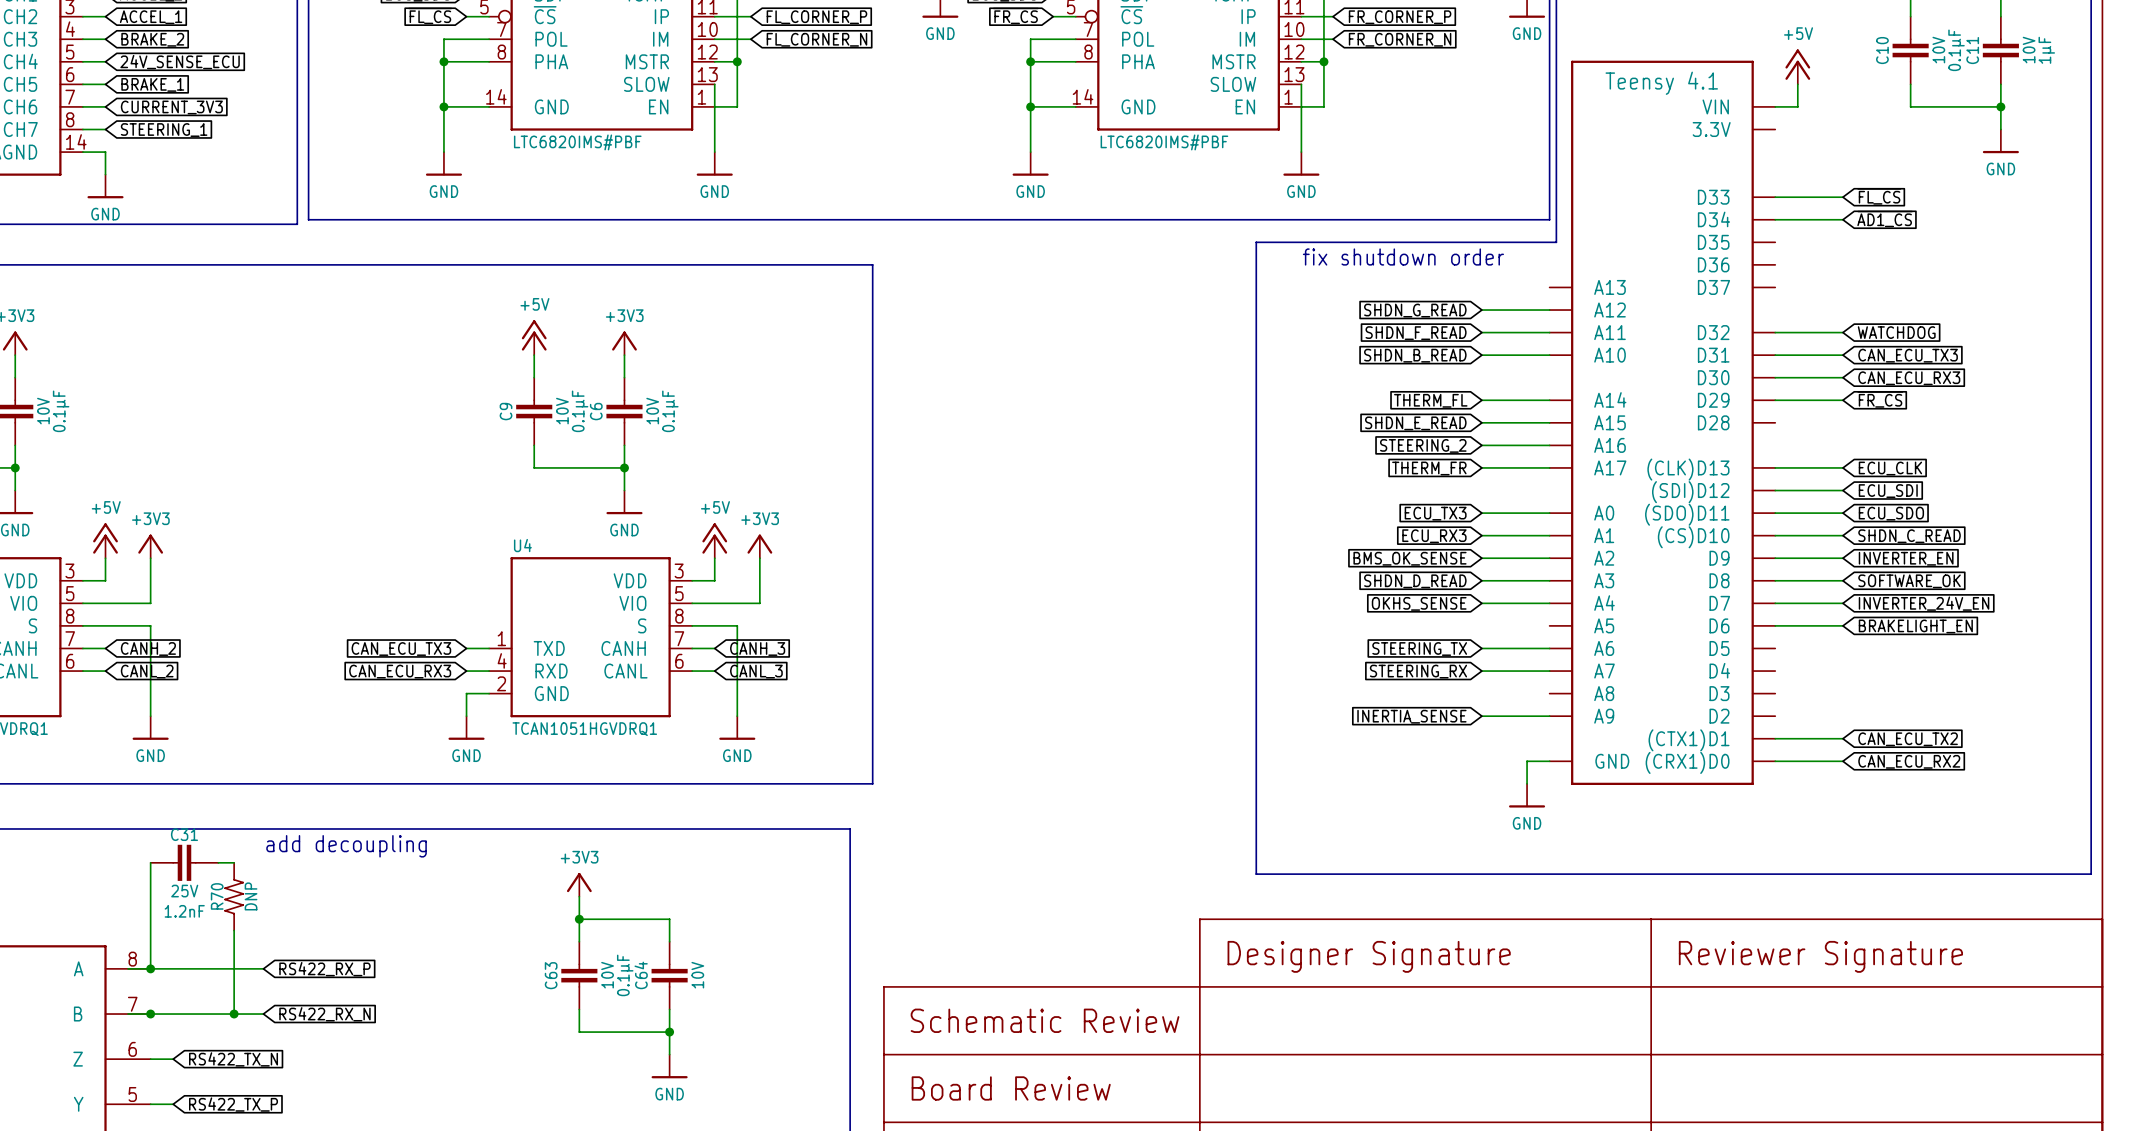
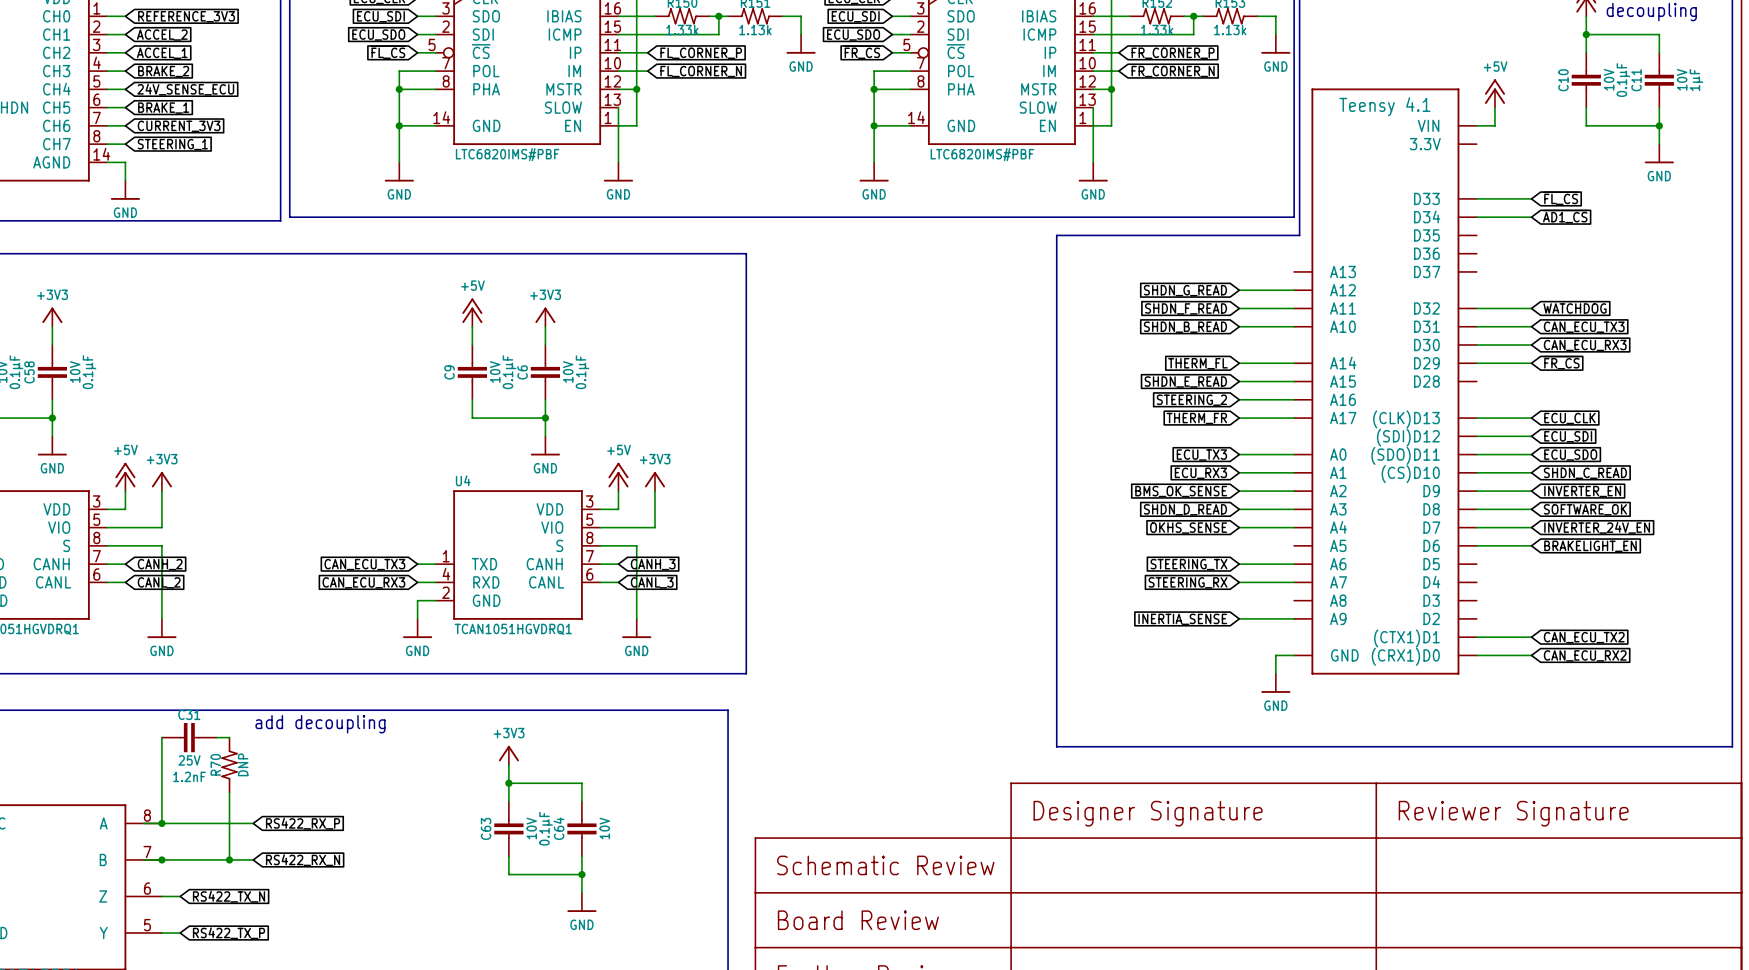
text: fix shutdown order (1403, 256) -> none

